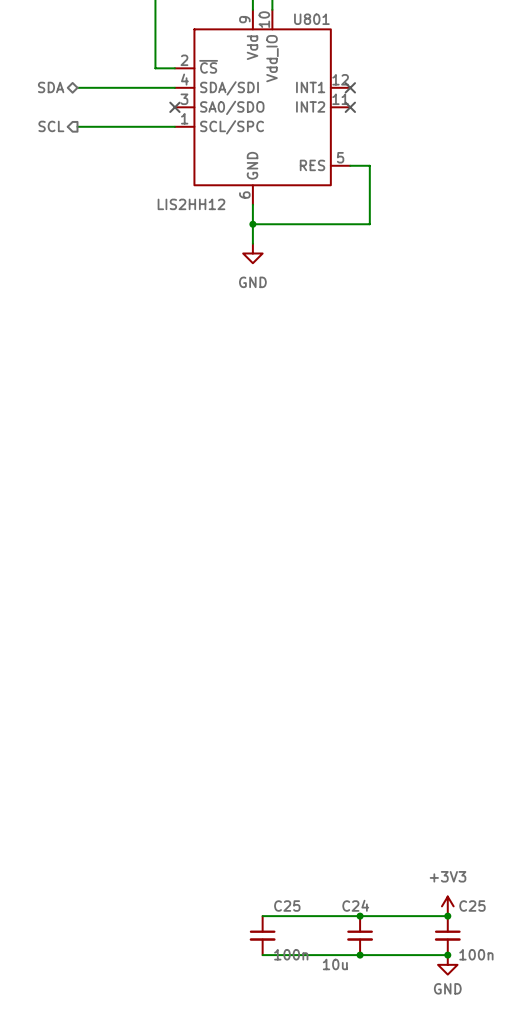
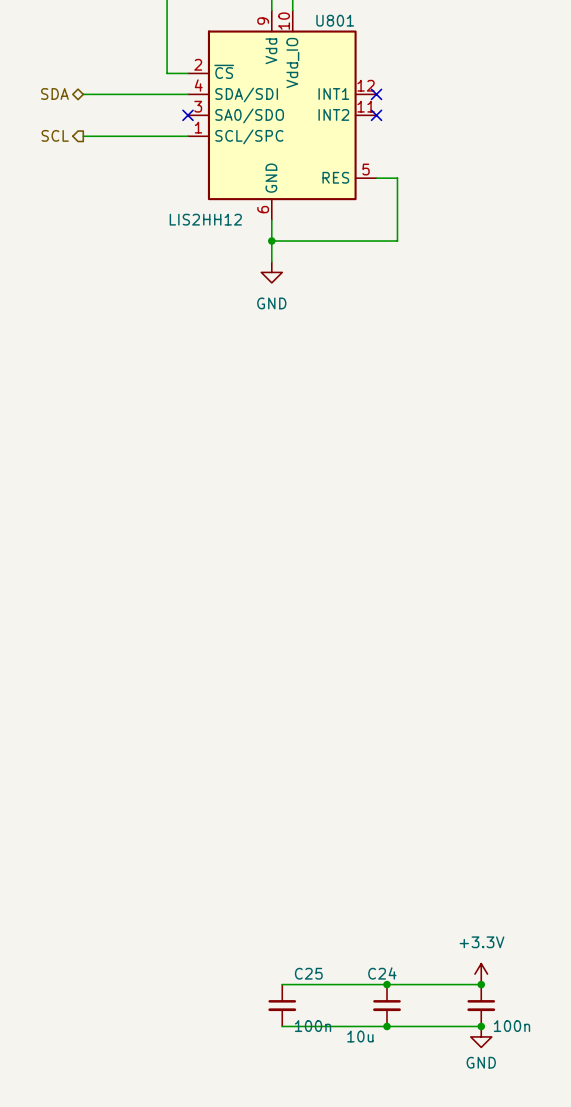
power symbol: +3V3 (447, 906) -> +3.3V (481, 974)
C25 name: C25 (472, 906) -> none

